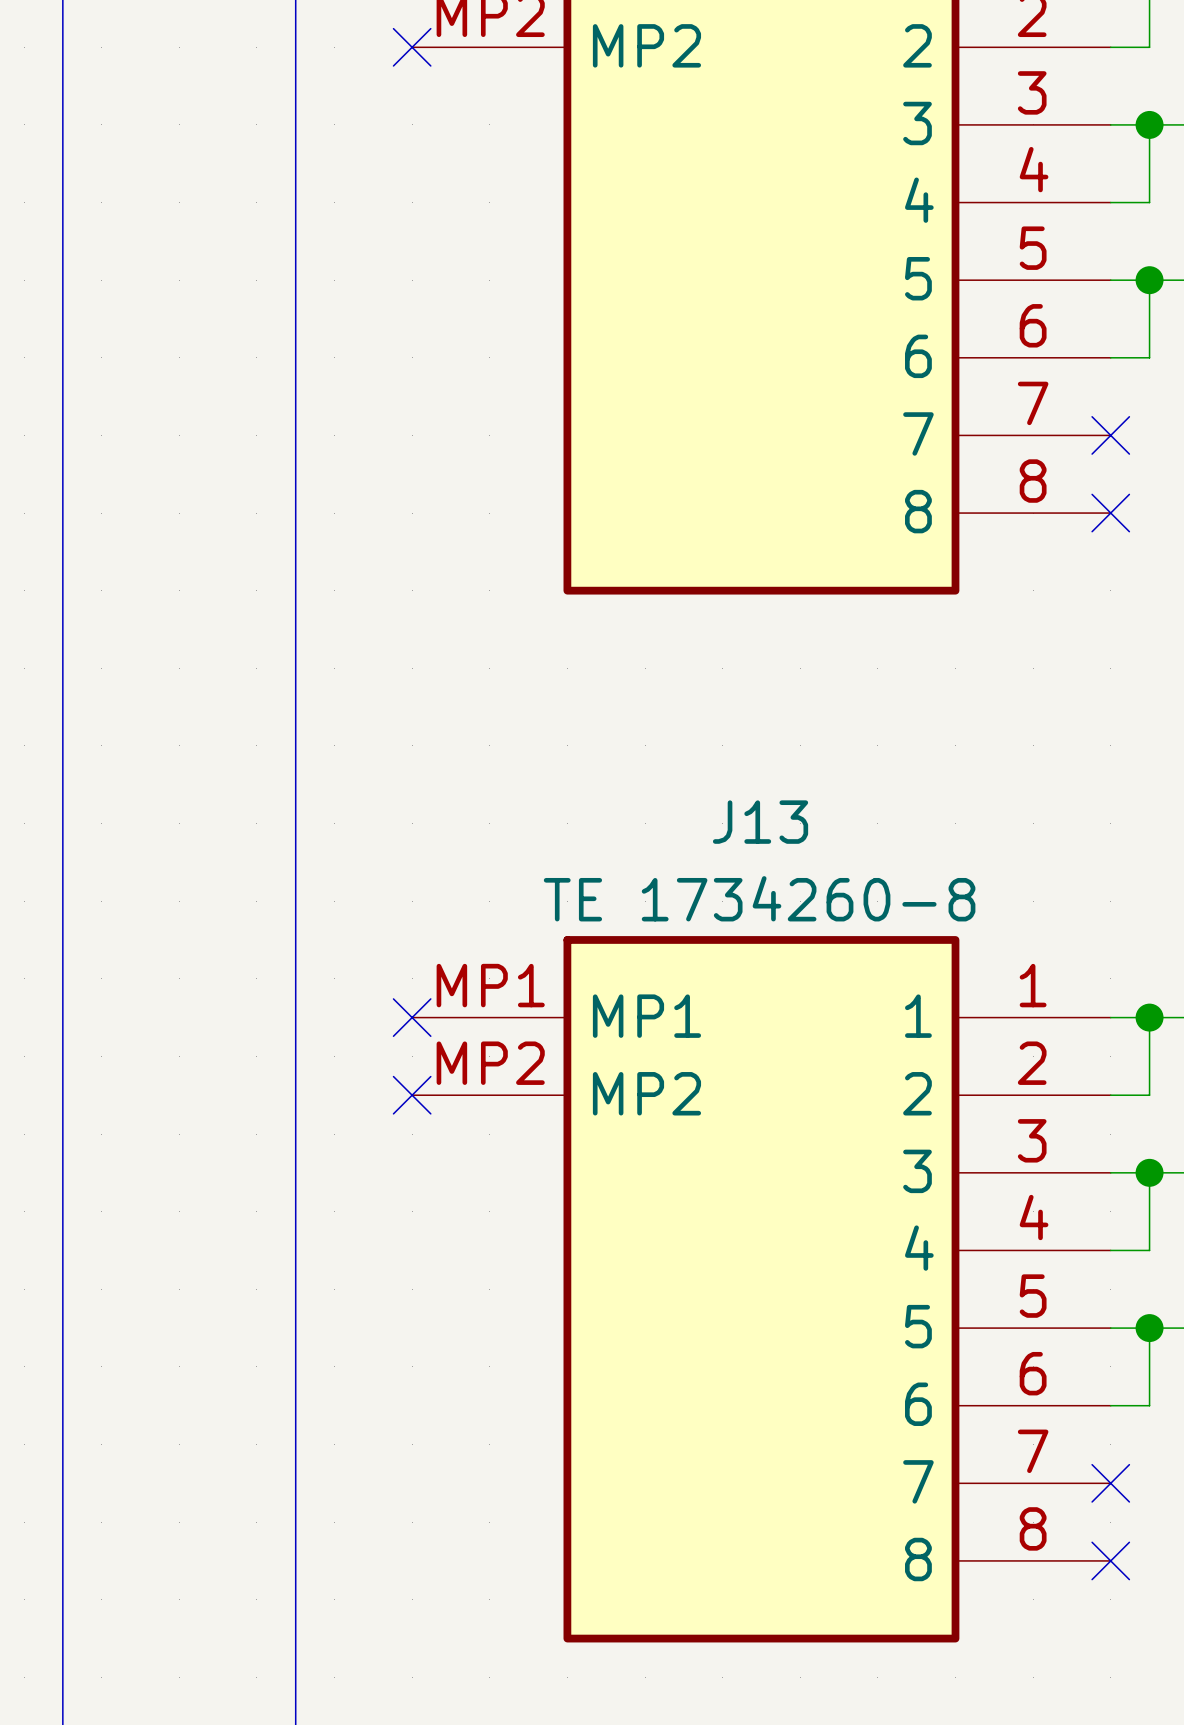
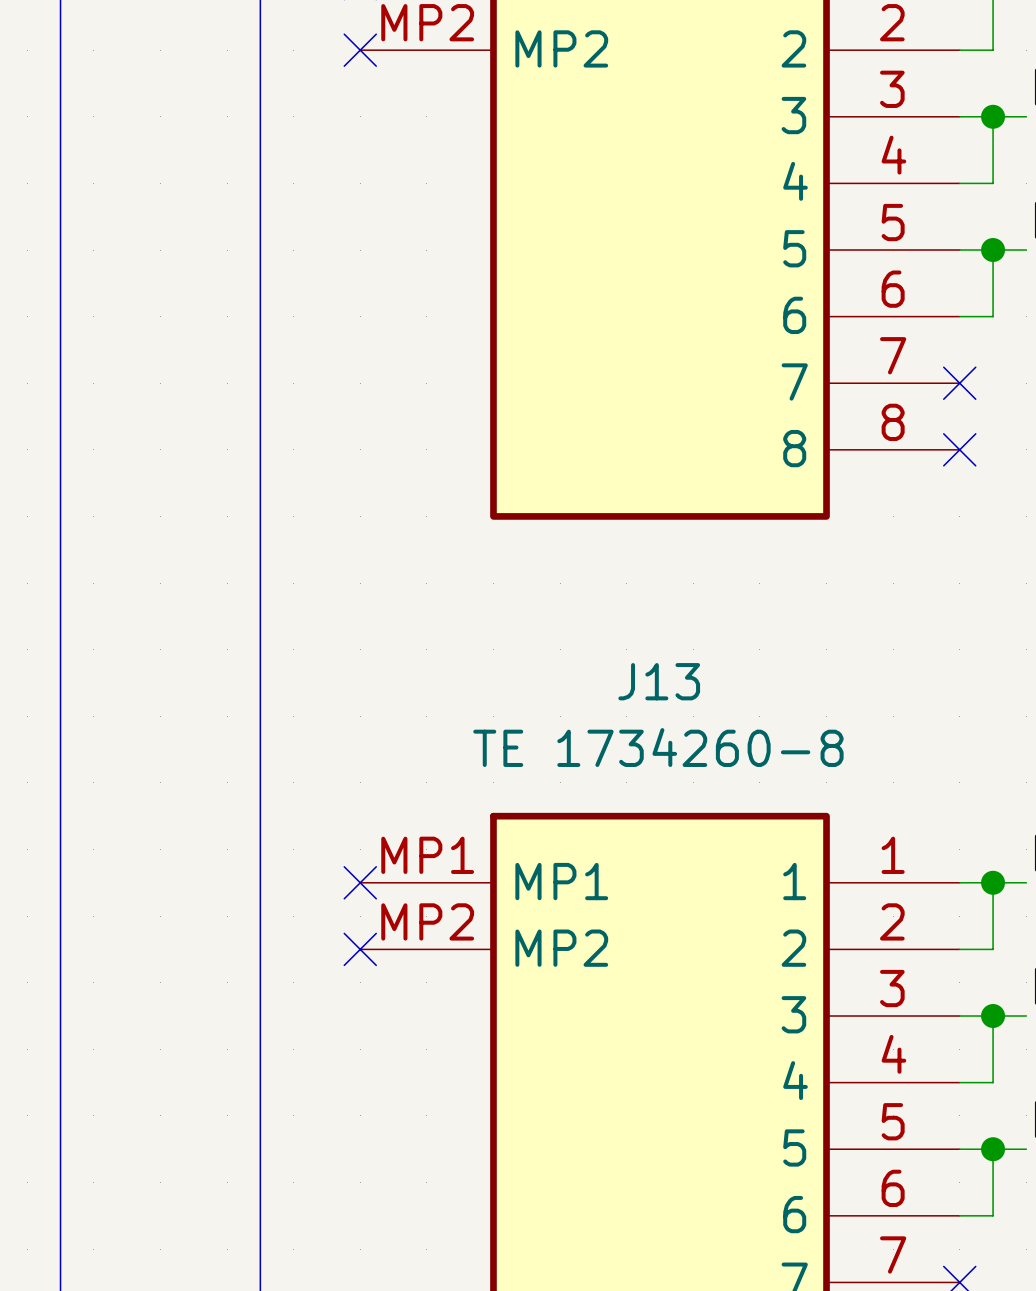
J13 name position: J13 (760, 822) -> J13 (659, 681)
J13 value position: TE 1734260-8 (759, 898) -> TE 1734260-8 (658, 747)

